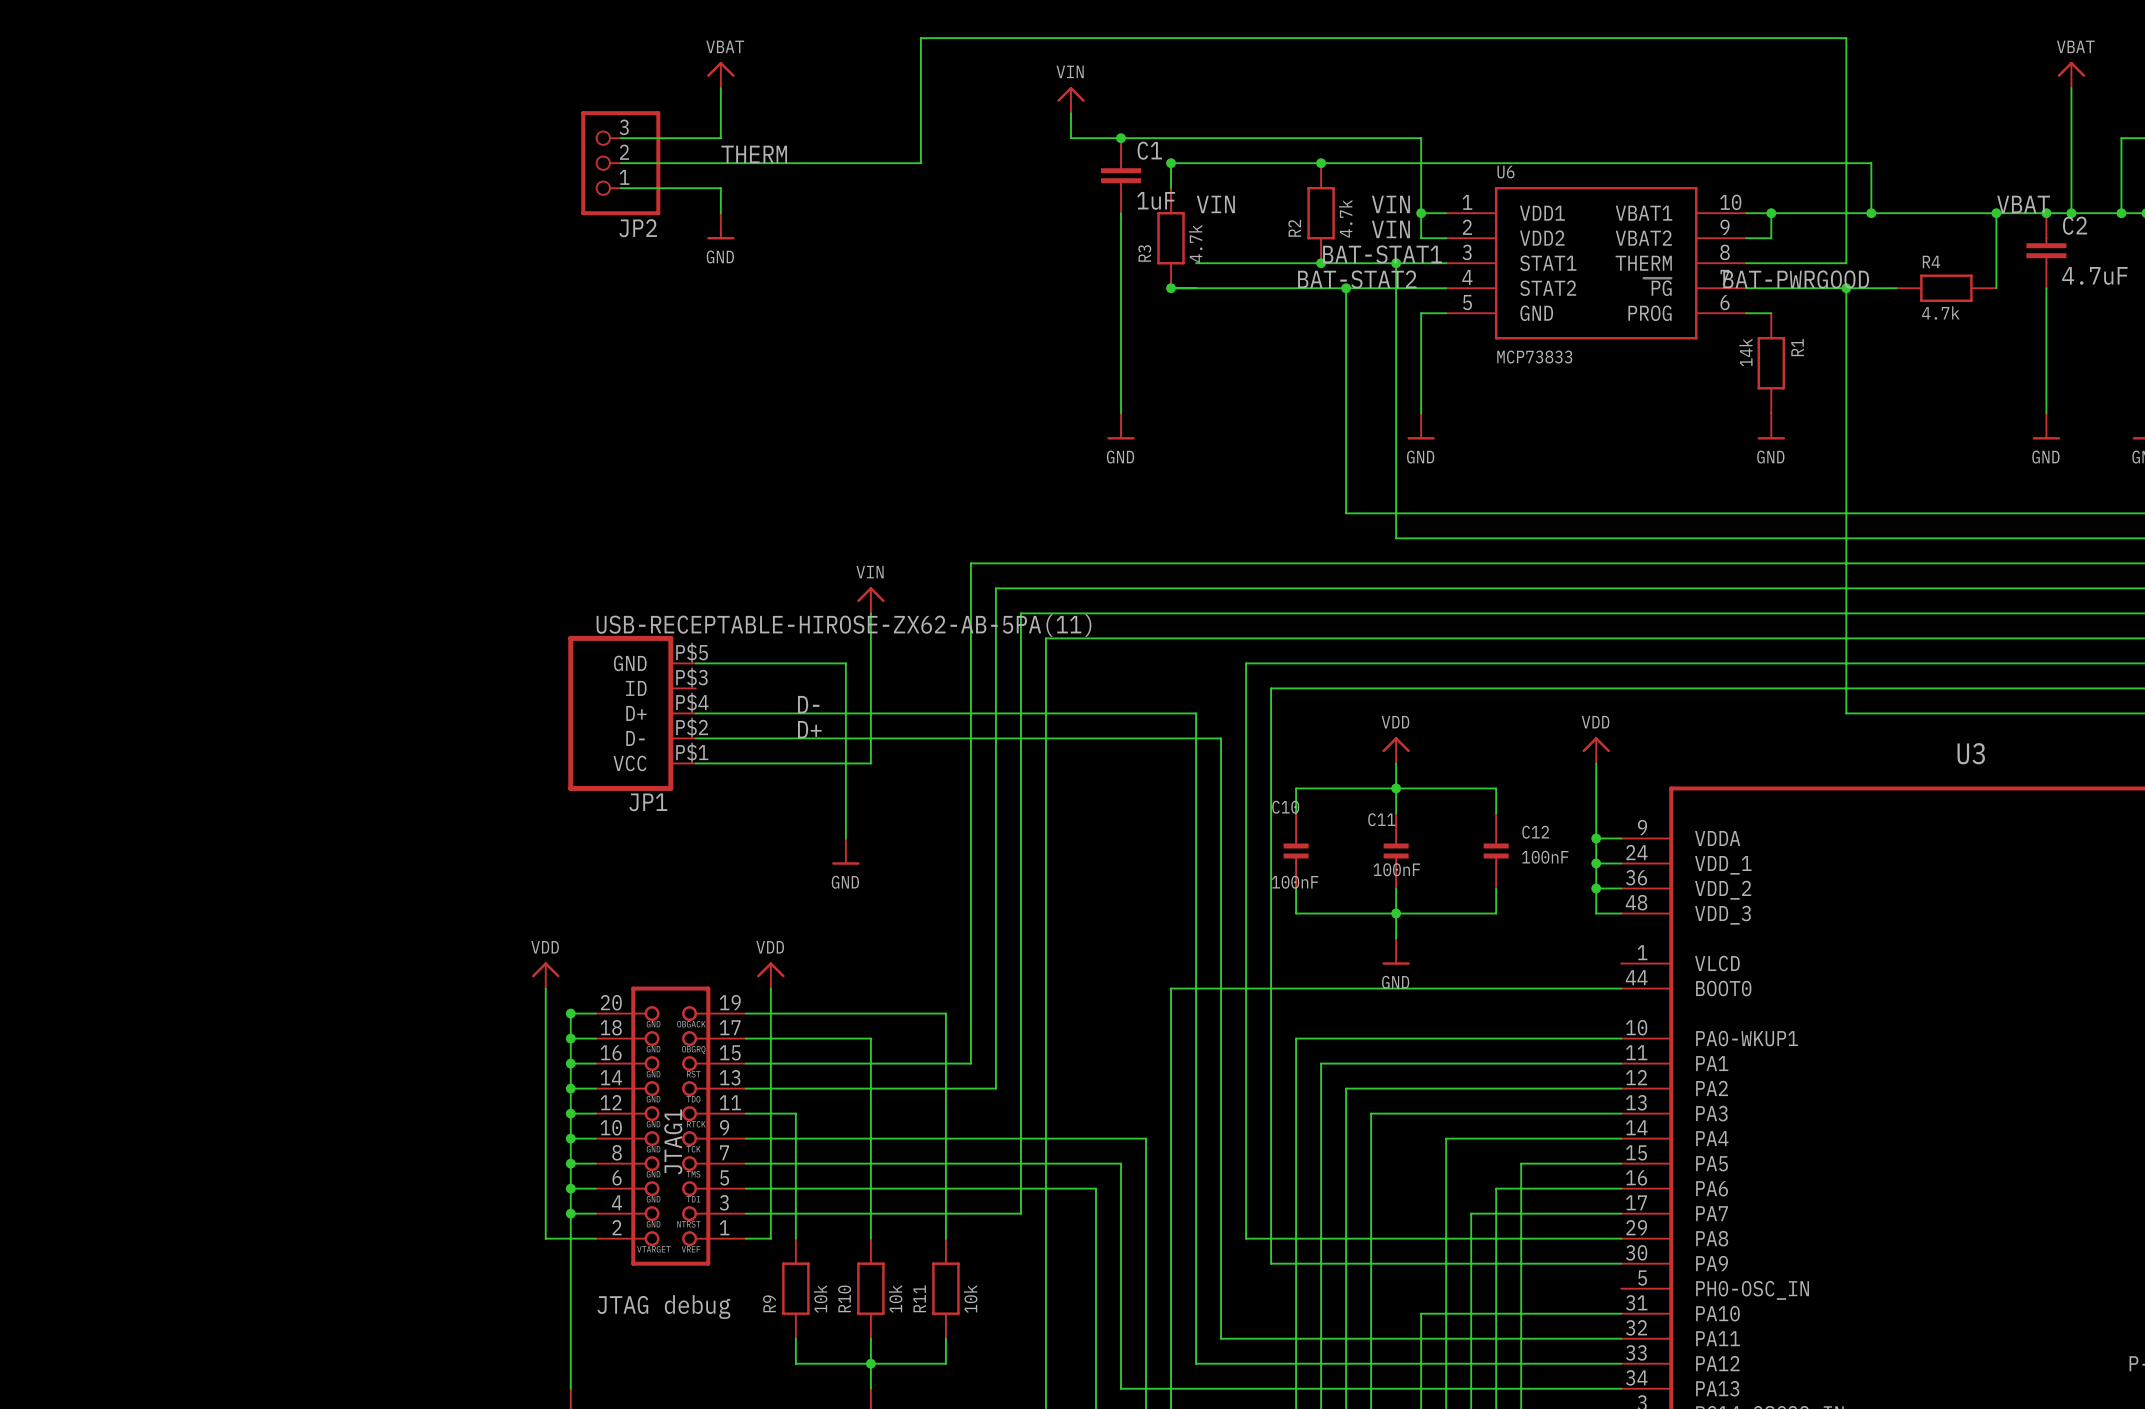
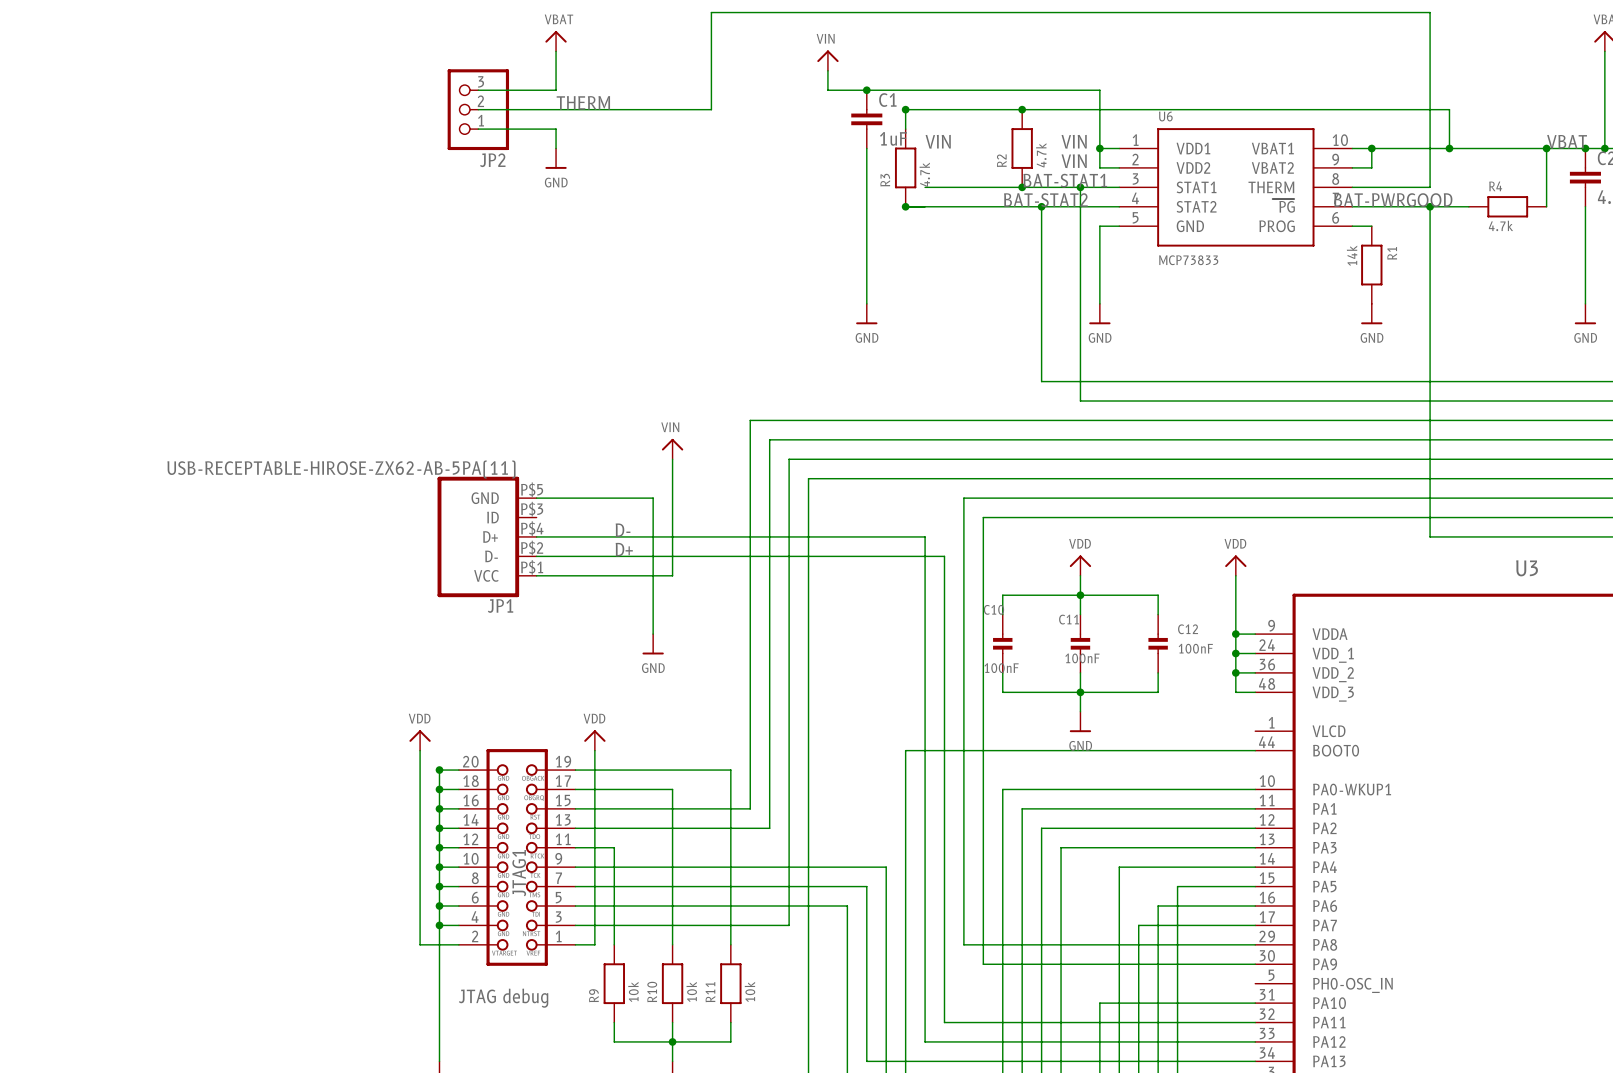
JP1 value position: USB-RECEPTABLE-HIROSE-ZX62-AB-5PA(11) (844, 625) -> USB-RECEPTABLE-HIROSE-ZX62-AB-5PA(11) (341, 469)

